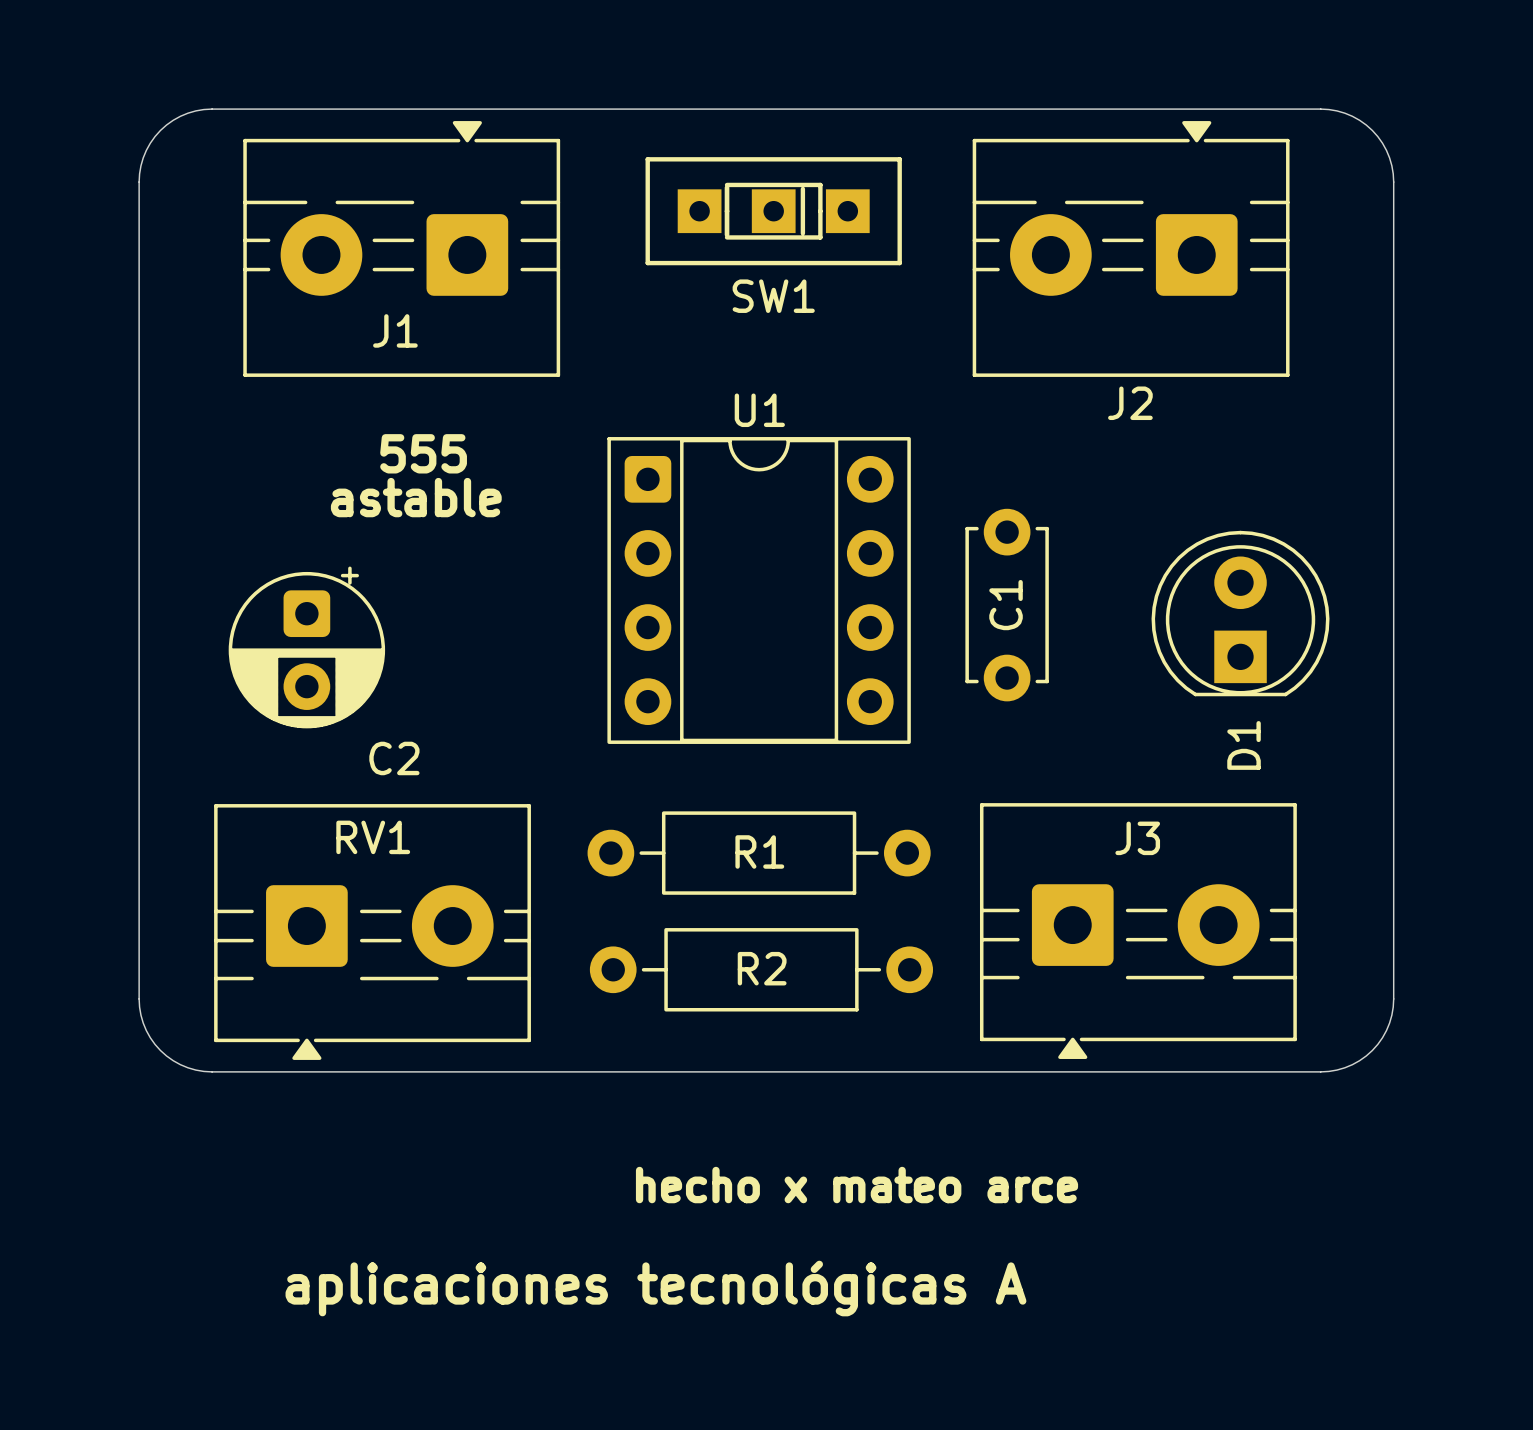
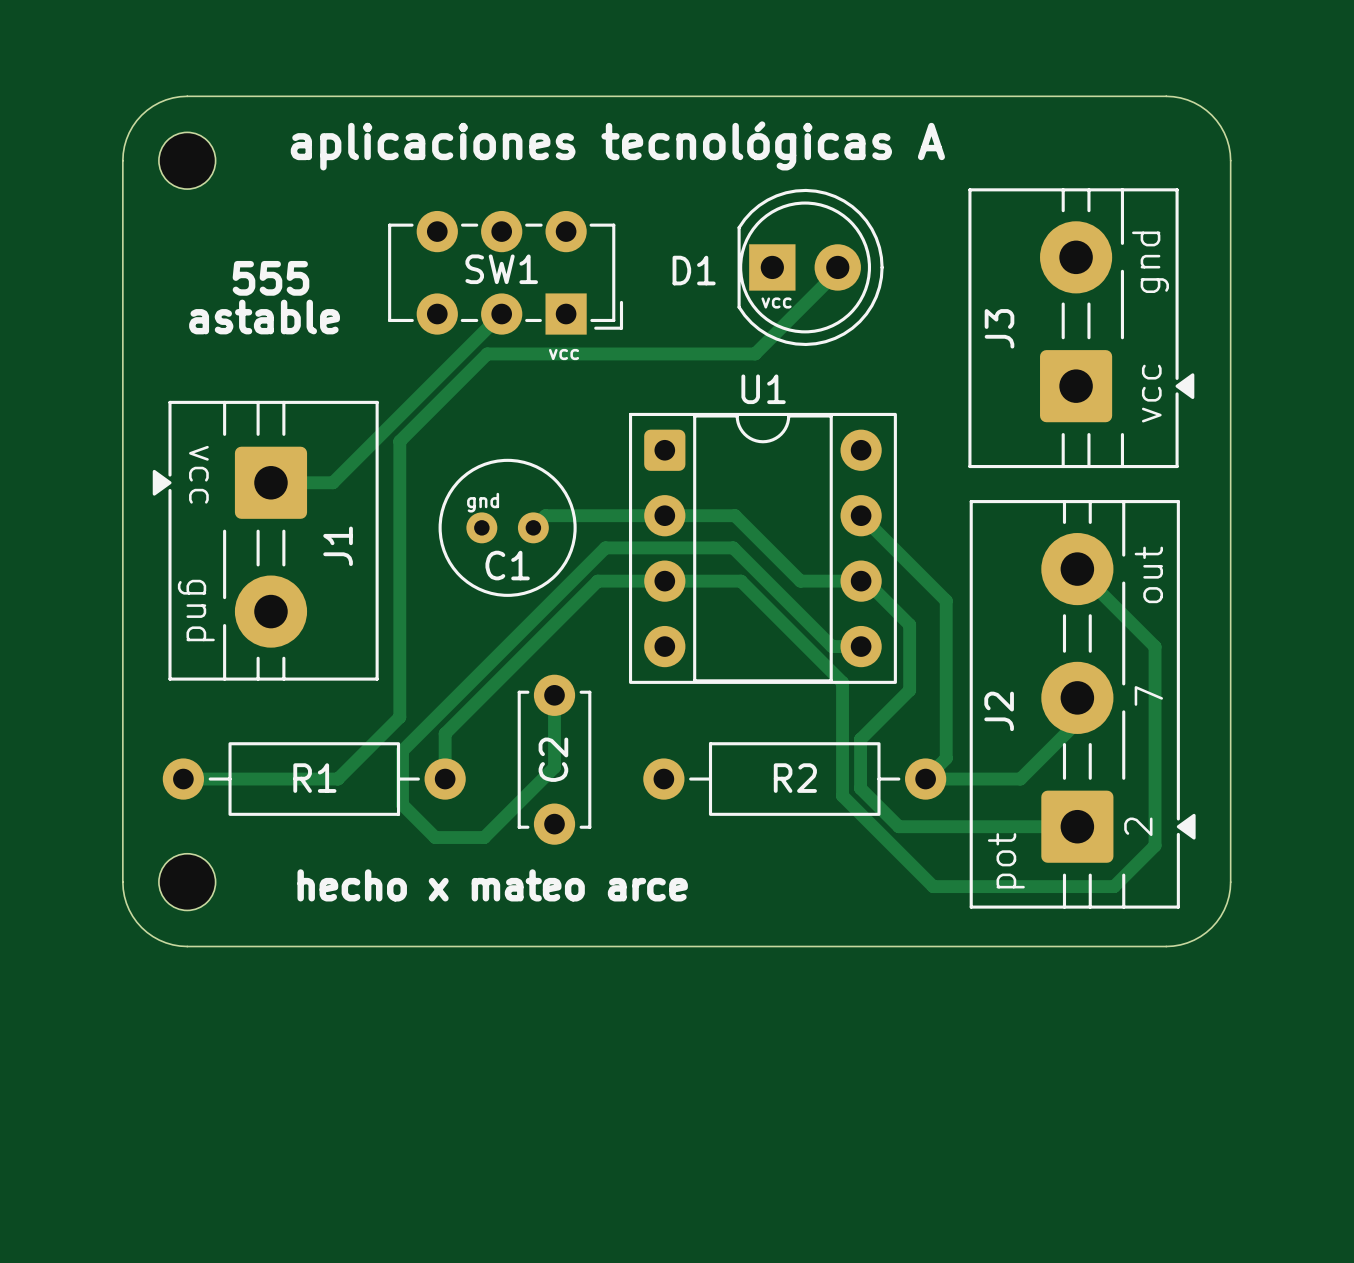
J2 footprint: [972, 121, 1290, 377] -> [969, 500, 1196, 909]
SW1 footprint: [645, 157, 902, 266] -> [388, 210, 624, 335]
text: none -> aplicaciones tecnológicas A (617, 145)
part: none -> (187, 160)
J1 rotation: 0° (401, 248) -> 90° counterclockwise (265, 540)
J1 position: (401, 248) -> (265, 540)
SW1 name position: SW1 (773, 296) -> SW1 (501, 269)
text: none -> gnd (1150, 262)
track: none -> (837, 267) (837, 271) (755, 353) (487, 353) (399, 441) (399, 717) (337, 779) (183, 779)
text: none -> vcc (776, 303)
track: none -> (501, 314) (332, 482) (270, 482)
text: none -> vcc (563, 354)
J2 name position: J2 (1130, 403) -> J2 (999, 711)
text: none -> vcc (1151, 393)
text position: 555 (423, 453) -> 555 (270, 278)
text position: astable (416, 497) -> astable (264, 316)
C1 footprint: [965, 508, 1049, 702] -> [438, 458, 577, 597]
D1 footprint: [1151, 530, 1330, 697] -> [737, 188, 884, 347]
text: none -> vcc (198, 474)
C2 footprint: [228, 566, 386, 729] -> [517, 674, 592, 845]
text: none -> gnd (483, 502)
track: none -> (861, 515) (946, 600) (946, 758) (925, 779) (1020, 779) (1077, 722) (1077, 697)
U1 position: (759, 590) -> (762, 548)
track: none -> (533, 527) (545, 515) (735, 515) (800, 581) (865, 581) (909, 624) (909, 690) (860, 739) (860, 788) (898, 826) (1077, 826)
track: none -> (1077, 569) (1155, 646) (1155, 845) (1114, 886) (933, 886) (842, 795) (842, 682) (741, 581) (597, 581) (445, 733) (445, 779)
text: none -> out (1148, 574)
text: none -> gnd (196, 610)
track: none -> (861, 646) (831, 646) (733, 547) (605, 547) (402, 750) (402, 804) (435, 837) (484, 837) (554, 767) (554, 695)
D1 name position: D1 (1244, 745) -> D1 (694, 270)
C2 name position: C2 (394, 758) -> C2 (553, 759)
text: none -> 7 (1148, 695)
R1 position: (759, 853) -> (314, 779)
RV1: (372, 931) -> none
J3 rotation: 0° (1138, 931) -> 90° counterclockwise (1081, 328)
J3 position: (1138, 931) -> (1081, 328)
text: none -> 2 (1138, 826)
R2 position: (761, 969) -> (794, 779)
text: none -> pot (1006, 860)
part: none -> (187, 882)
text position: hecho x mateo arce (857, 1185) -> hecho x mateo arce (492, 885)
text: aplicaciones tecnológicas A (655, 1288) -> none

